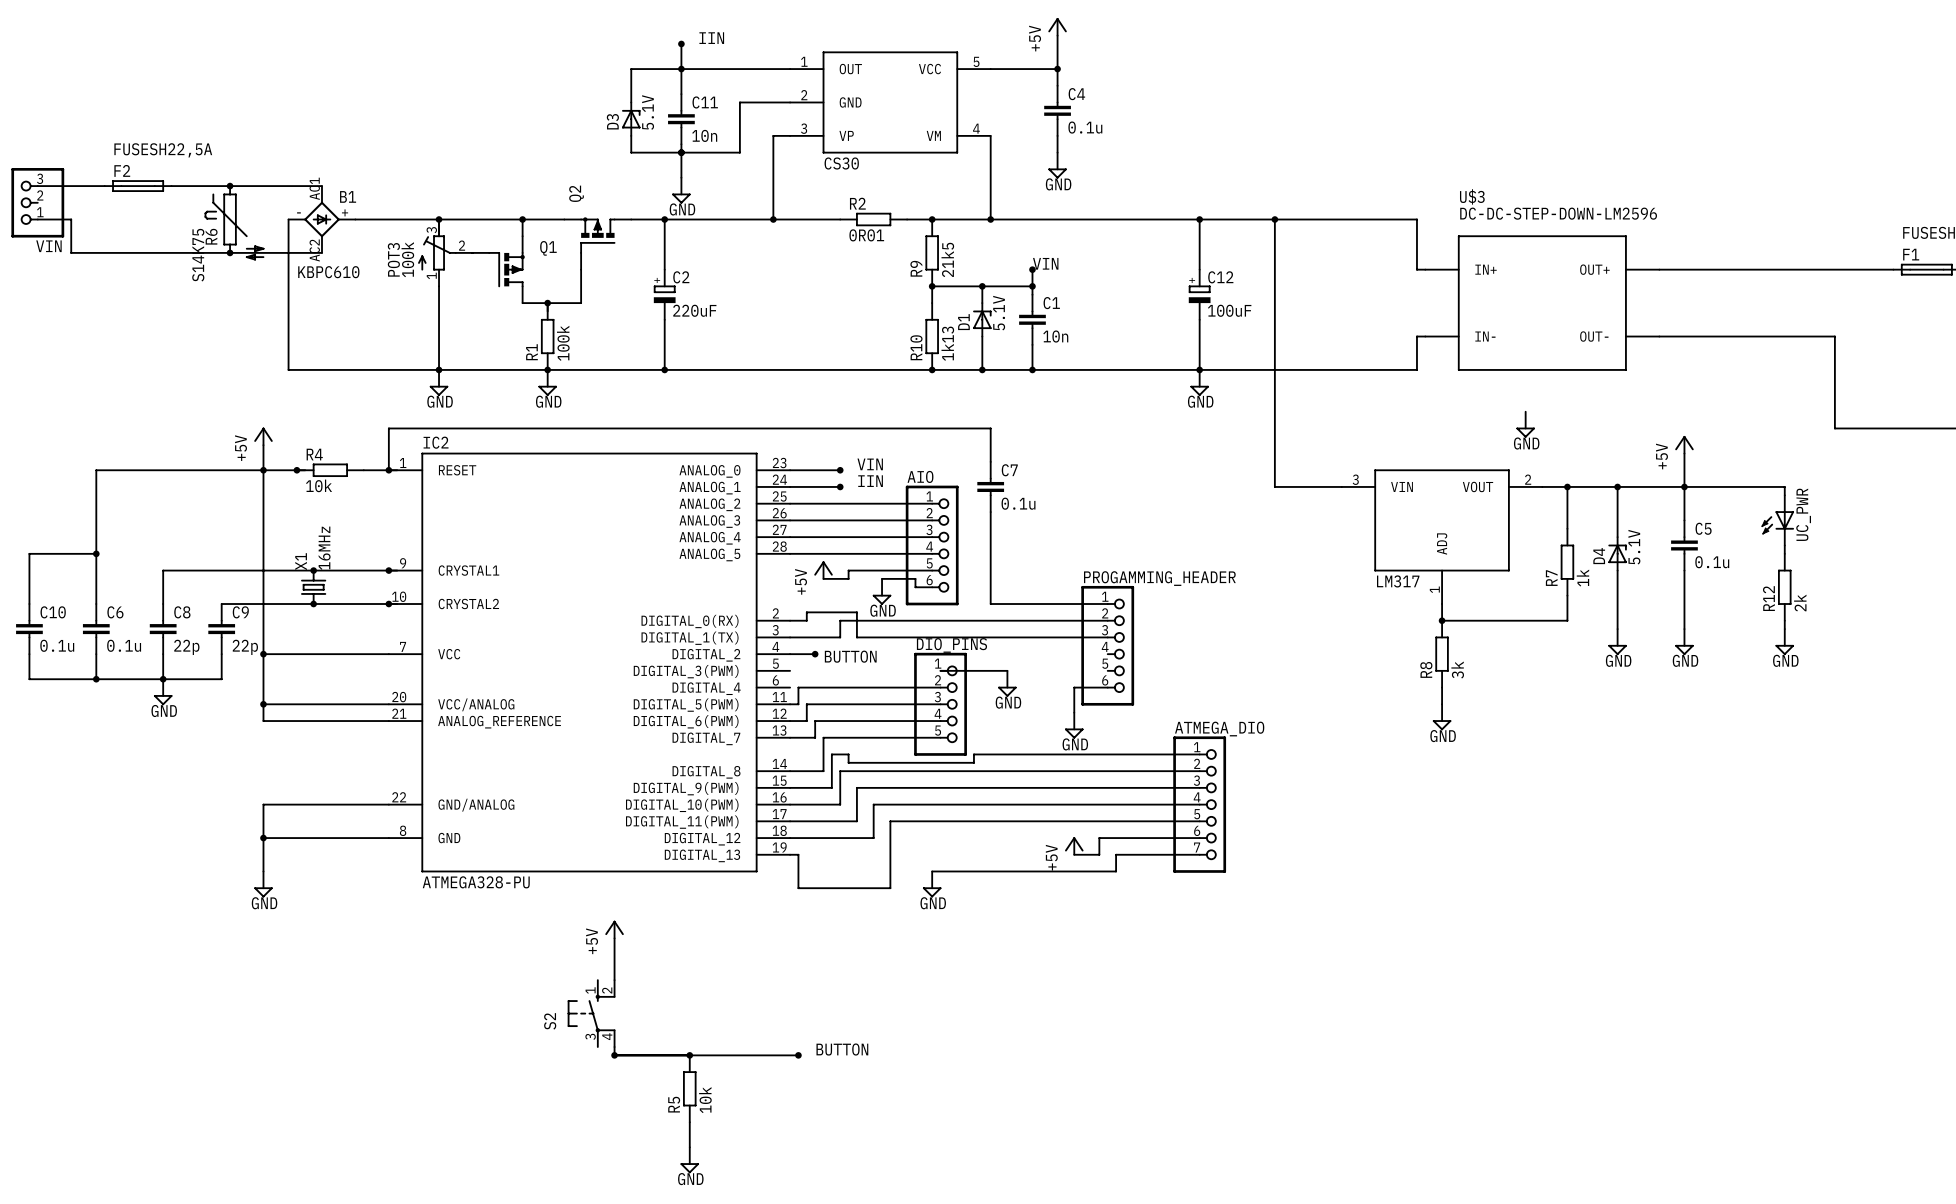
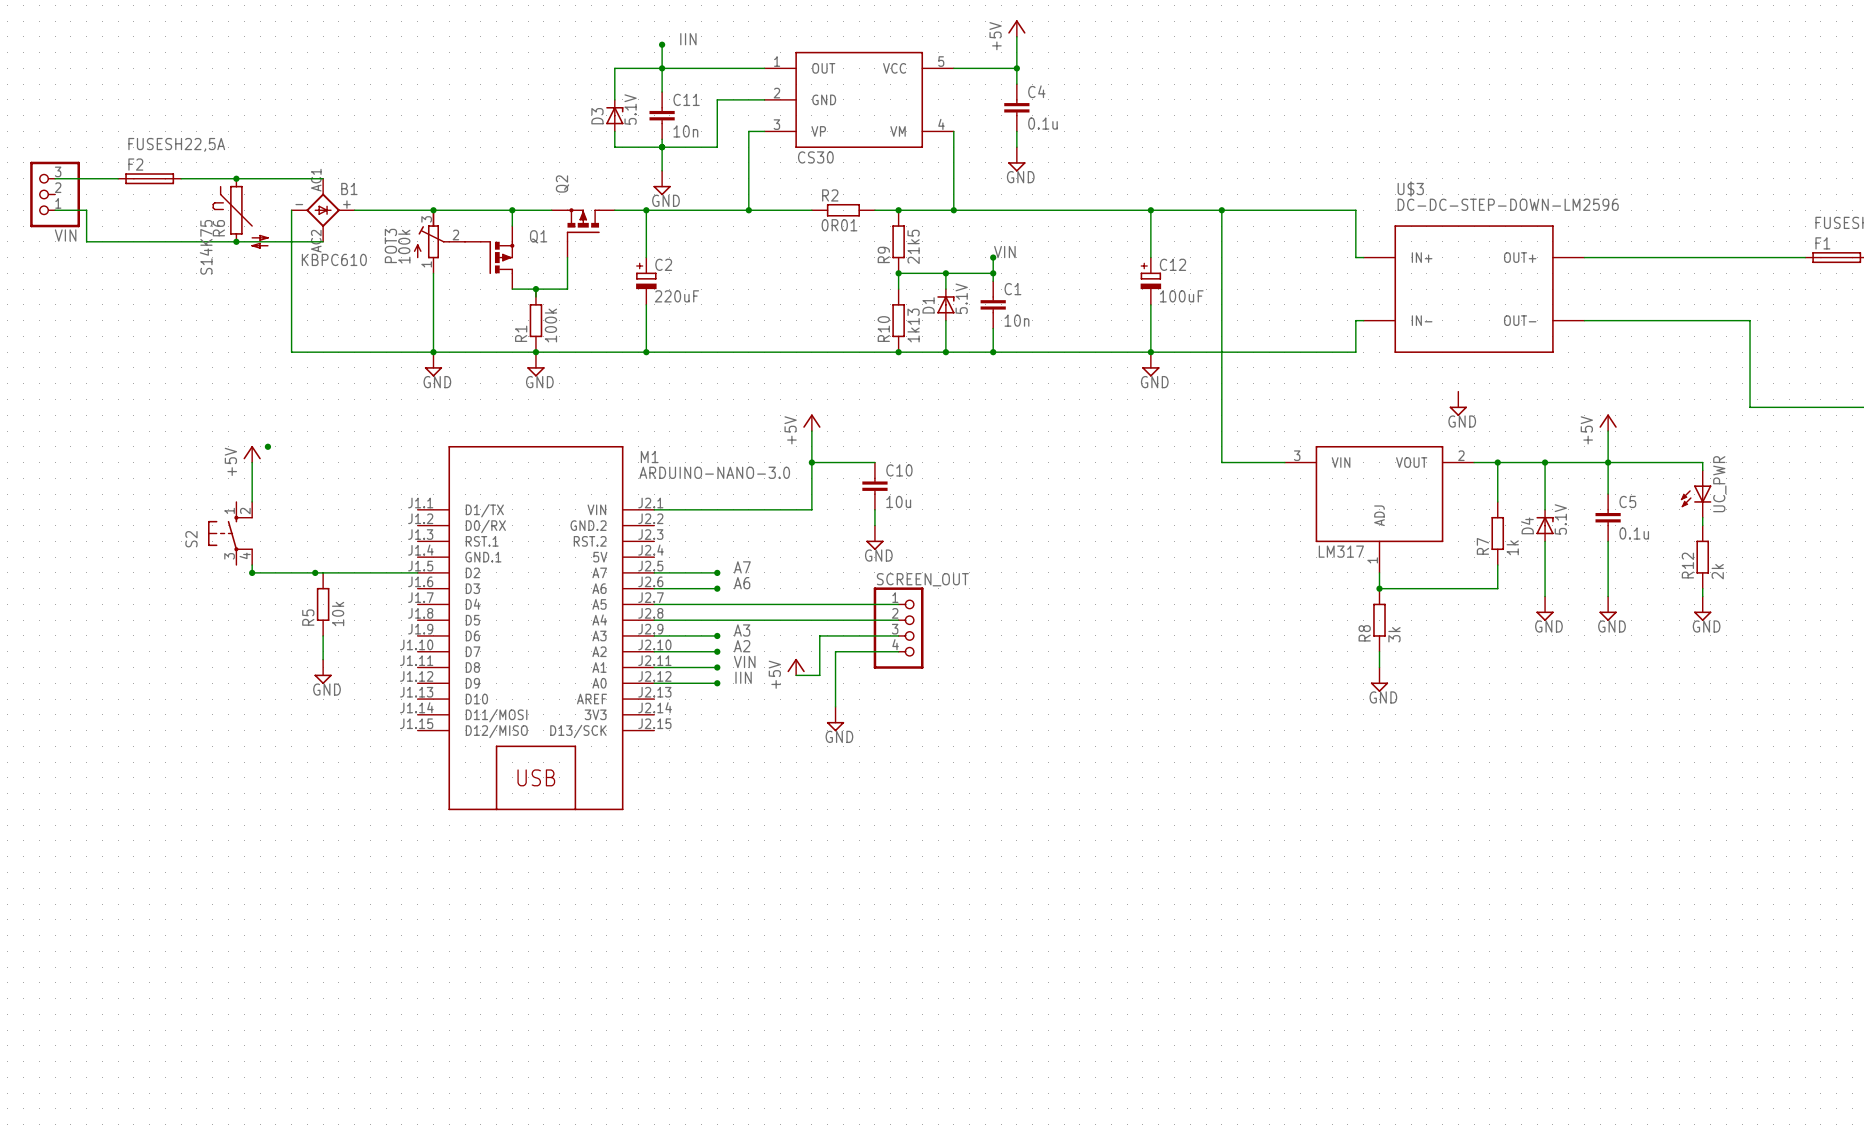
power symbol position: +5V (263, 436) -> +5V (252, 454)
power symbol: none -> +5V (811, 422)
wire: (263, 445) (263, 721) (388, 721) -> none
wire: (990, 461) (990, 428) (388, 428) (388, 470) -> none
label: VIN (870, 464) -> none
junction: (296, 470) -> none
wire: (305, 470) (96, 470) (96, 604) -> none
R4: 10k (330, 470) -> none
wire: (363, 470) (397, 470) -> none
junction: (388, 470) -> none
wire: (790, 470) (840, 470) -> none
junction: (840, 470) -> none
label: IIN (870, 481) -> none
wire: none -> (252, 462) (252, 501)
wire: (790, 486) (840, 486) -> (874, 462) (811, 462)
C7: 0.1u (990, 486) -> none
wire: (790, 503) (932, 503) -> none
wire: (990, 512) (990, 604) (1107, 604) -> none
wire: (790, 520) (932, 520) -> none
wire: none -> (654, 509) (764, 509)
wire: (840, 537) (932, 537) -> (811, 509) (811, 431)
AIO: (932, 545) -> none
wire: (96, 553) (29, 553) (29, 604) -> none
junction: (96, 553) -> none
wire: (790, 553) (932, 553) -> none
junction: (313, 570) -> none
junction: (388, 570) -> none
wire: (397, 570) (163, 570) (163, 604) -> none
power symbol: +5V (823, 570) -> none
wire: (932, 570) (848, 570) (848, 578) (823, 578) -> none
wire: (882, 578) (915, 578) (915, 587) (932, 587) -> none
X1: 16MHz (313, 587) -> none
power symbol position: GND (882, 591) -> GND (874, 537)
label: none -> A7 (742, 567)
wire: (221, 604) (246, 604) -> (252, 565) (252, 572)
junction: none -> (252, 572)
junction: (388, 604) -> none
wire: none -> (654, 572) (717, 572)
junction: none -> (717, 572)
label: none -> A6 (742, 583)
wire: none -> (654, 588) (717, 588)
junction: none -> (717, 588)
wire: (790, 620) (806, 620) (806, 612) (856, 612) (856, 637) -> (811, 604) (827, 604)
wire: (1107, 620) (840, 620) (840, 637) -> none
C10 position: (29, 629) -> (874, 486)
C6: 0.1u (96, 629) -> none
C8: 22p (163, 629) -> none
C9: 22p (221, 629) -> none
wire: none -> (654, 604) (764, 604)
wire: (932, 637) (1107, 637) -> none
C10 value: 0.1u (57, 645) -> 10u (898, 501)
PROGAMMING_HEADER: (1107, 645) -> none
wire: (29, 654) (29, 679) (221, 679) (221, 654) -> none
wire: (96, 654) (96, 679) -> none
wire: (163, 654) (163, 679) -> (323, 635) (323, 659)
wire: (263, 654) (388, 654) -> none
junction: (263, 654) -> none
wire: none -> (654, 620) (764, 620)
wire: none -> (788, 620) (898, 620)
junction: (815, 654) -> none
label: BUTTON (850, 656) -> none
M1: none -> ARDUINO-NANO-3.0 (535, 628)
IC2: ATMEGA328-PU (589, 662) -> none
SCREEN_OUT: none -> (898, 628)
label: none -> A3 (742, 630)
wire: none -> (654, 635) (717, 635)
junction: none -> (717, 635)
wire: none -> (898, 635) (819, 635) (819, 675) (796, 675)
wire: (940, 670) (1007, 670) -> none
junction: (96, 679) -> none
junction: (163, 679) -> none
label: none -> A2 (742, 646)
power symbol: GND (1007, 683) -> none
wire: none -> (654, 651) (717, 651)
junction: none -> (717, 651)
wire: (865, 687) (798, 687) (798, 704) (790, 704) -> (835, 651) (835, 706)
wire: (1107, 687) (1074, 687) (1074, 712) -> none
power symbol: GND (163, 692) -> none
label: none -> VIN (744, 661)
power symbol: none -> +5V (796, 667)
wire: (263, 704) (388, 704) -> none
junction: (263, 704) -> none
wire: none -> (654, 667) (717, 667)
junction: none -> (717, 667)
wire: (940, 704) (806, 704) (806, 721) (790, 721) -> none
DIO_PINS: (940, 704) -> none
power symbol: none -> GND (323, 671)
label: none -> IIN (743, 677)
wire: none -> (654, 683) (717, 683)
junction: none -> (717, 683)
wire: (940, 721) (815, 721) (815, 737) (790, 737) -> none
power symbol: GND (1074, 725) -> none
wire: (940, 737) (823, 737) (823, 771) (790, 771) -> none
wire: (1199, 754) (973, 754) (973, 762) (848, 762) (848, 754) (831, 754) (831, 787) (790, 787) -> none
power symbol: none -> GND (835, 719)
wire: (1199, 771) (840, 771) (840, 804) (790, 804) -> none
wire: (1199, 787) (856, 787) (856, 821) (790, 821) -> none
wire: (388, 804) (263, 804) (263, 871) -> none
wire: (1199, 804) (873, 804) (873, 838) (790, 838) -> none
ATMEGA_DIO: (1199, 804) -> none
wire: (1199, 821) (890, 821) (890, 888) (798, 888) (798, 854) (790, 854) -> none
wire: (263, 838) (388, 838) -> none
junction: (263, 838) -> none
wire: (1199, 838) (1099, 838) (1099, 854) (1074, 854) -> none
power symbol: +5V (1074, 845) -> none
wire: (1199, 854) (1116, 854) (1116, 871) (932, 871) -> none
power symbol: GND (263, 884) -> none
power symbol: GND (932, 884) -> none
power symbol: +5V (614, 929) -> none
wire: (614, 938) (614, 980) -> none
S2 position: (591, 1013) -> (230, 533)
wire: (614, 1047) (614, 1055) (798, 1055) -> none
label: BUTTON (842, 1049) -> none
junction: (614, 1055) -> none
junction: (689, 1055) -> none
junction: (798, 1055) -> none
R5 position: (689, 1088) -> (323, 604)
wire: (689, 1122) (689, 1147) -> none
power symbol: GND (689, 1160) -> none

